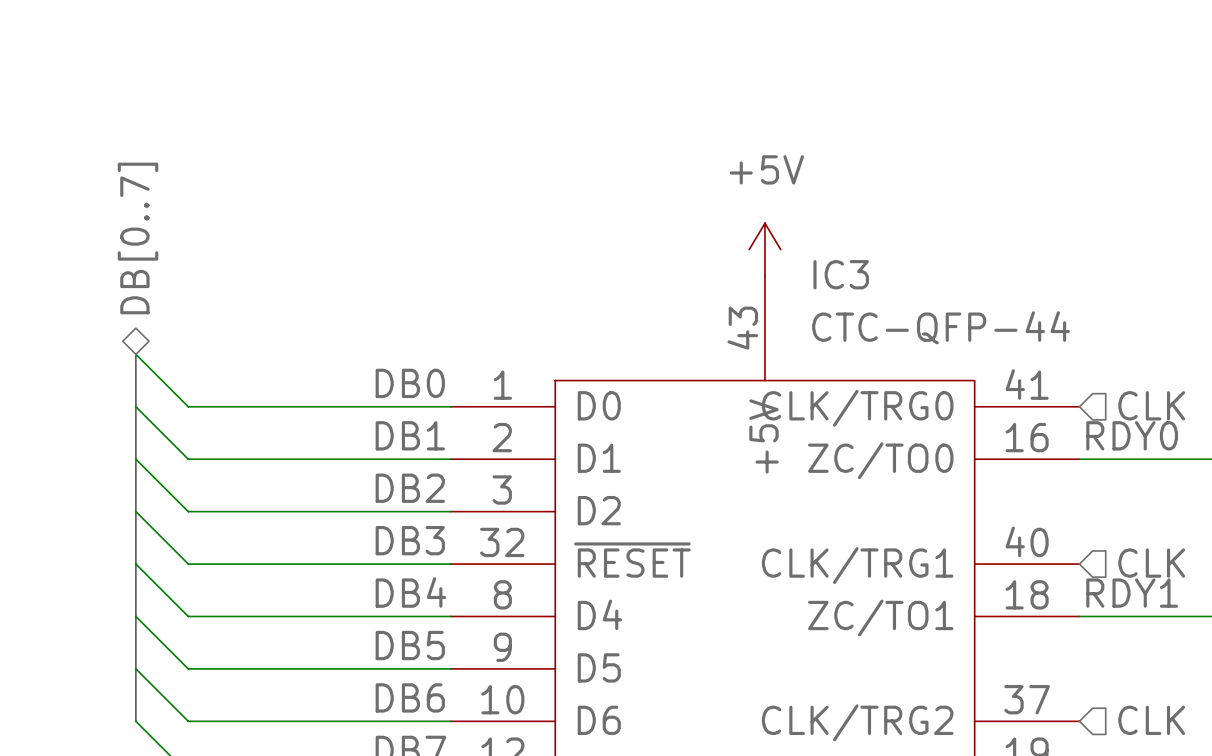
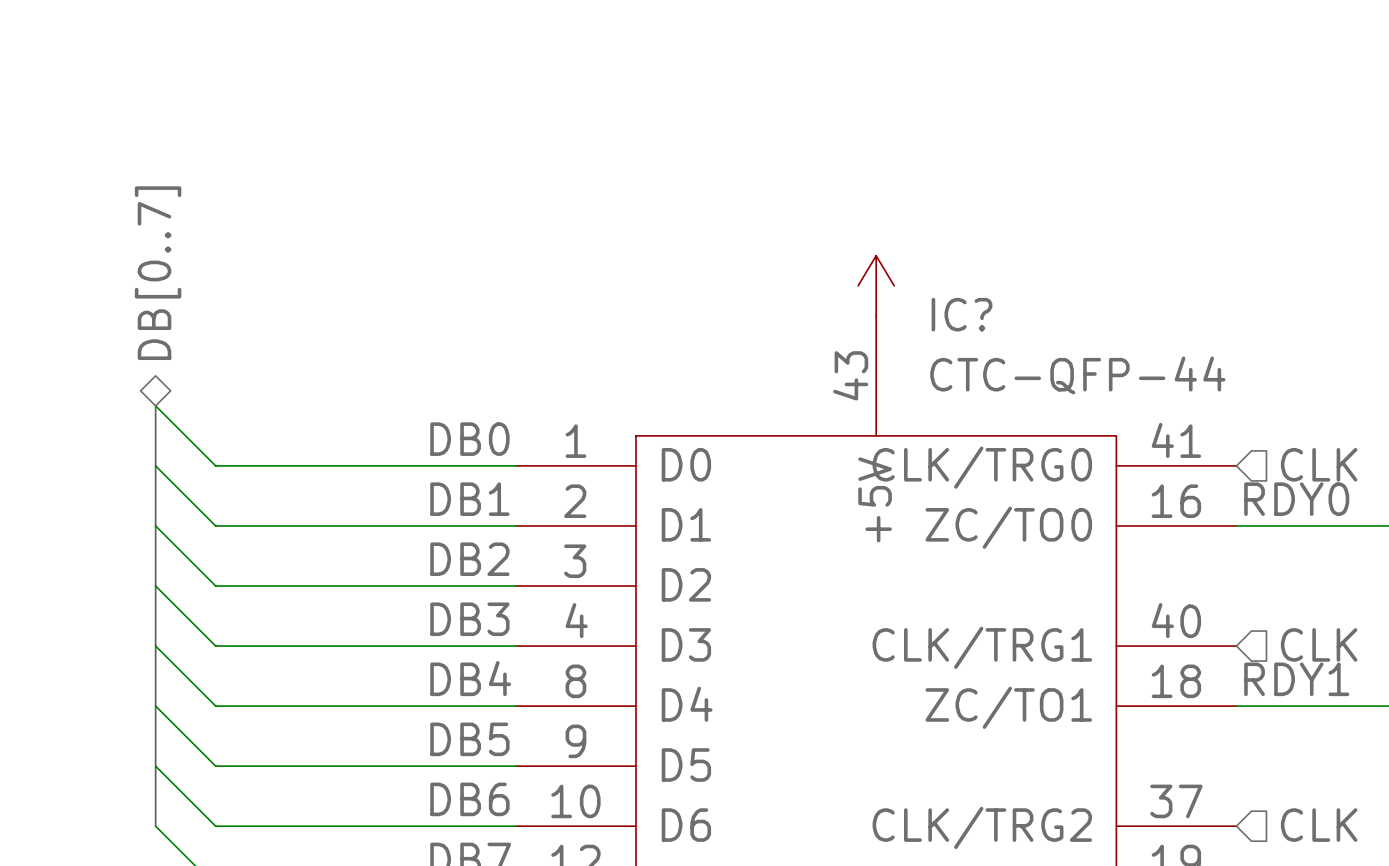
power symbol text: +5V (766, 169) -> none
IC3 name: IC3 (841, 274) -> IC? (962, 314)
IC3 pin number: 32 (502, 542) -> 4 (576, 620)
IC3 pin name: ~{RESET} (632, 560) -> D3 (686, 644)

